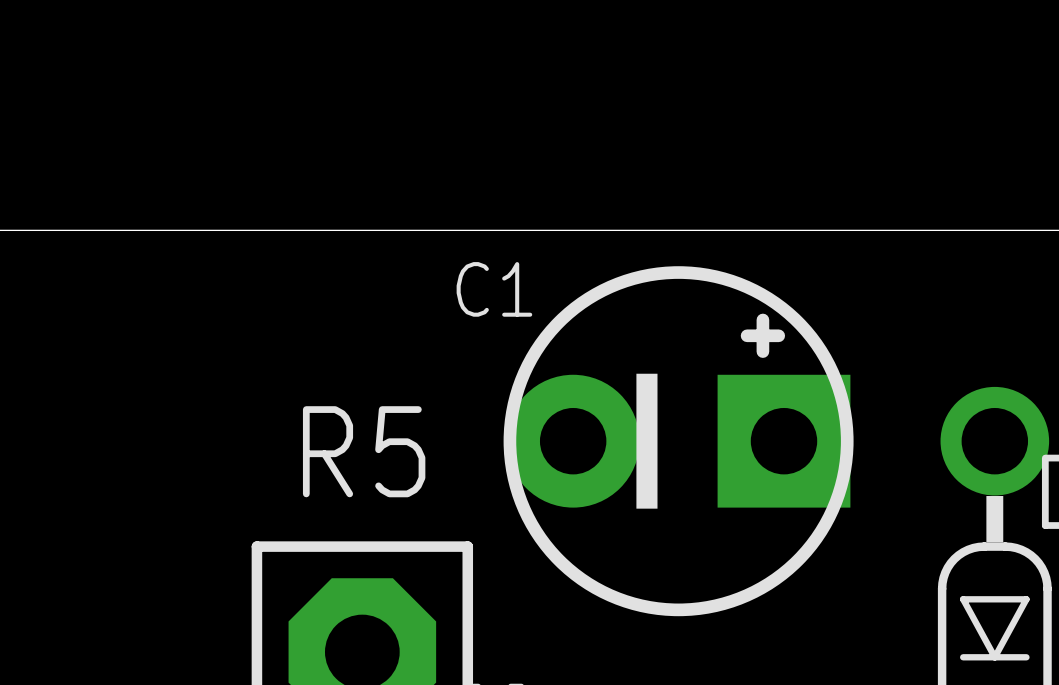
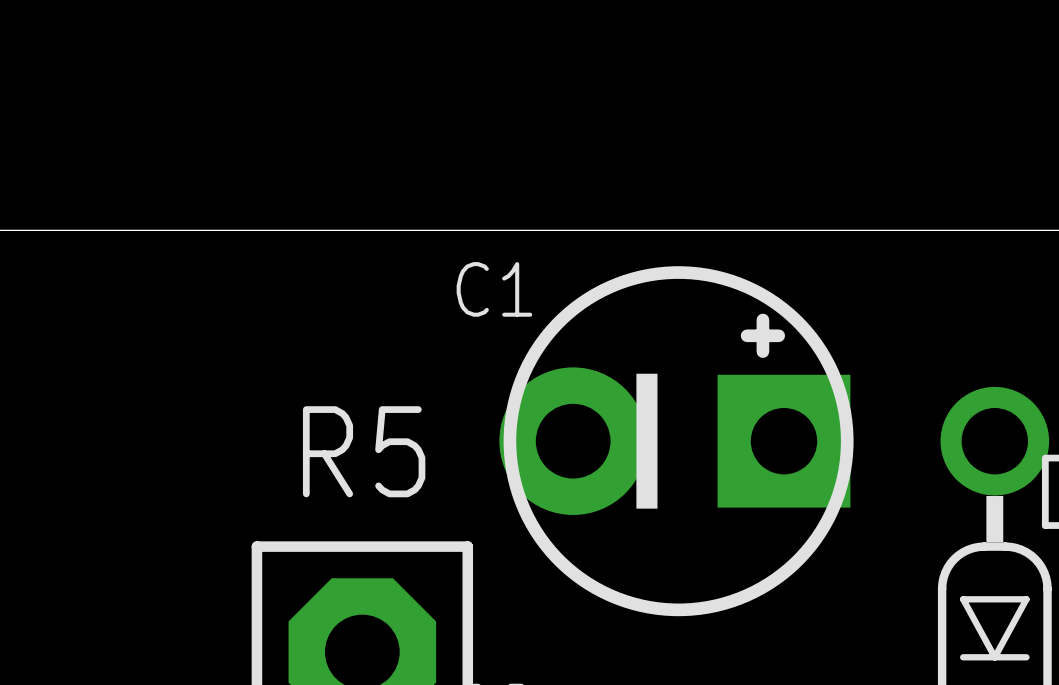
C1 footprint: [503, 266, 854, 617] -> [499, 266, 854, 617]

